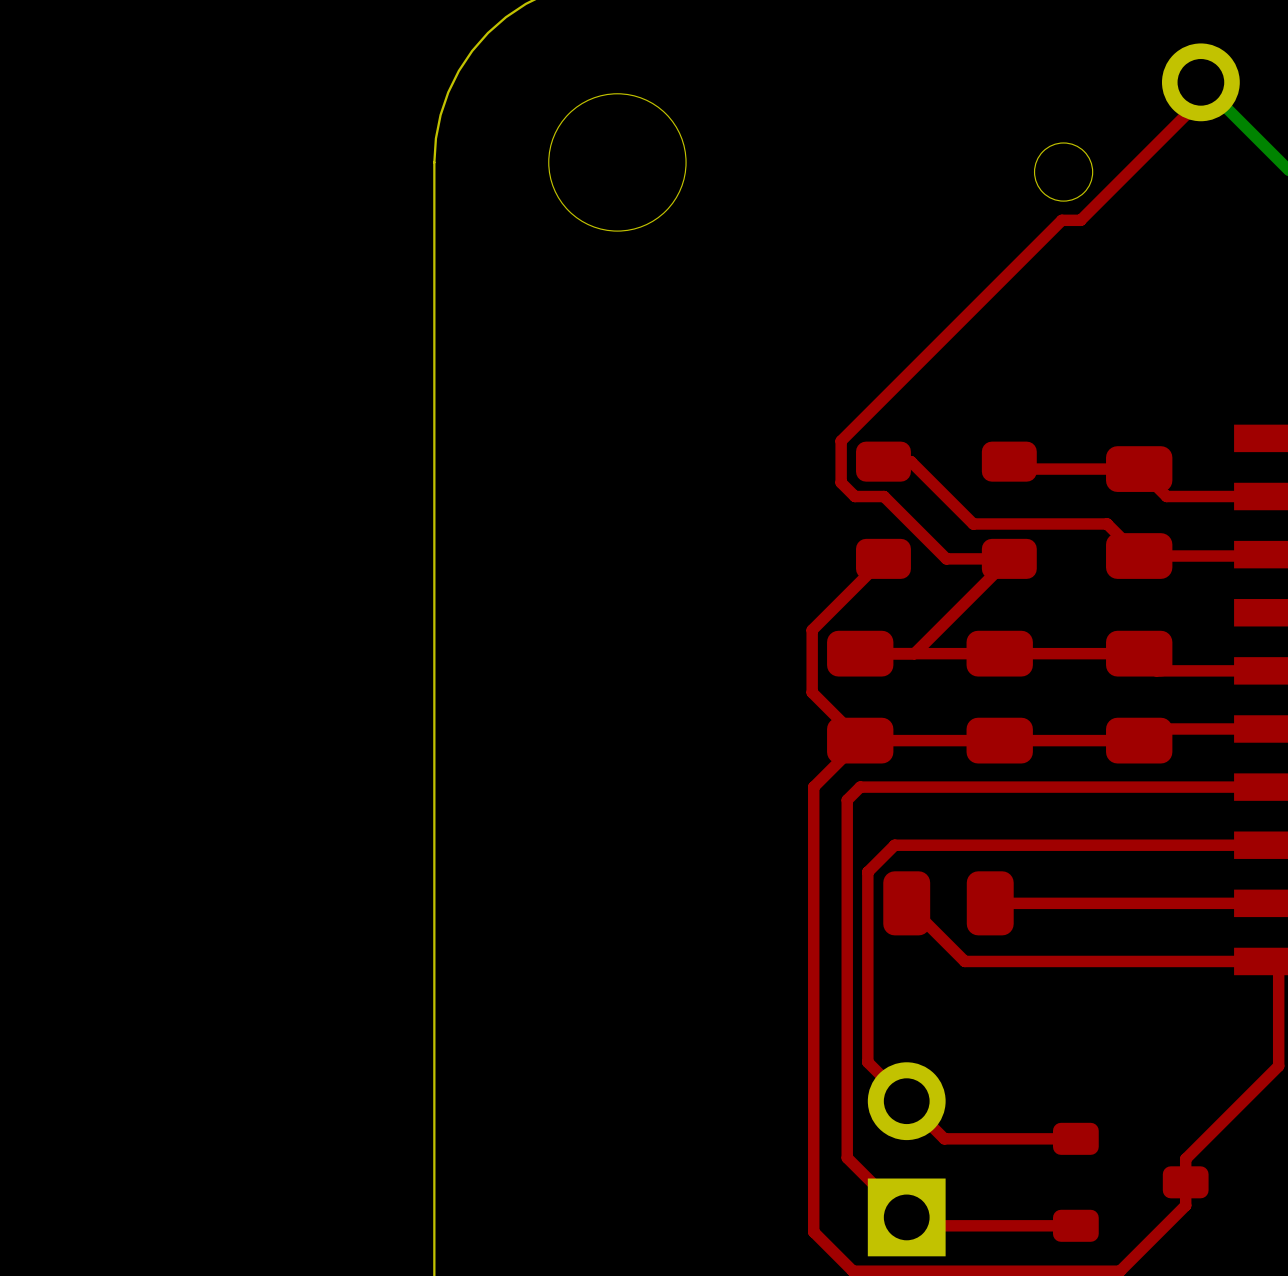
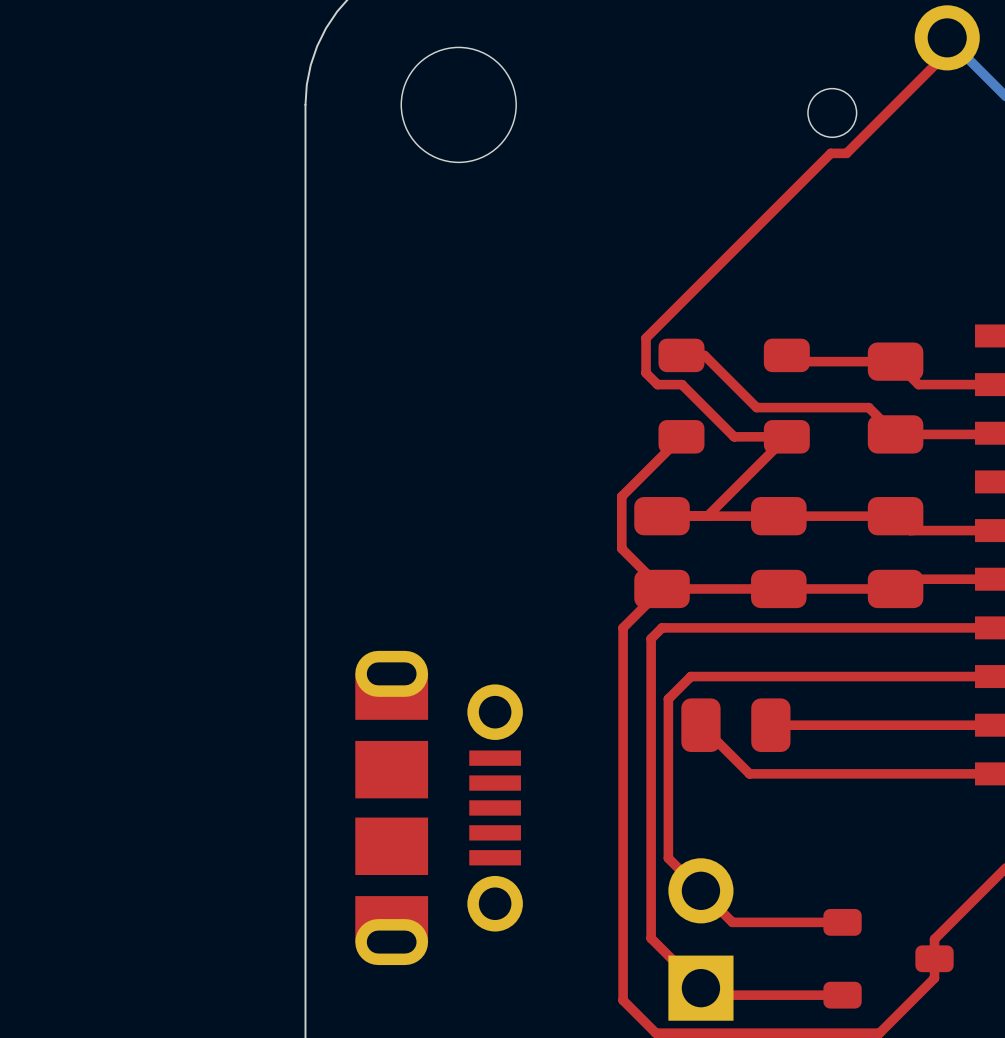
part: none -> (439, 807)

